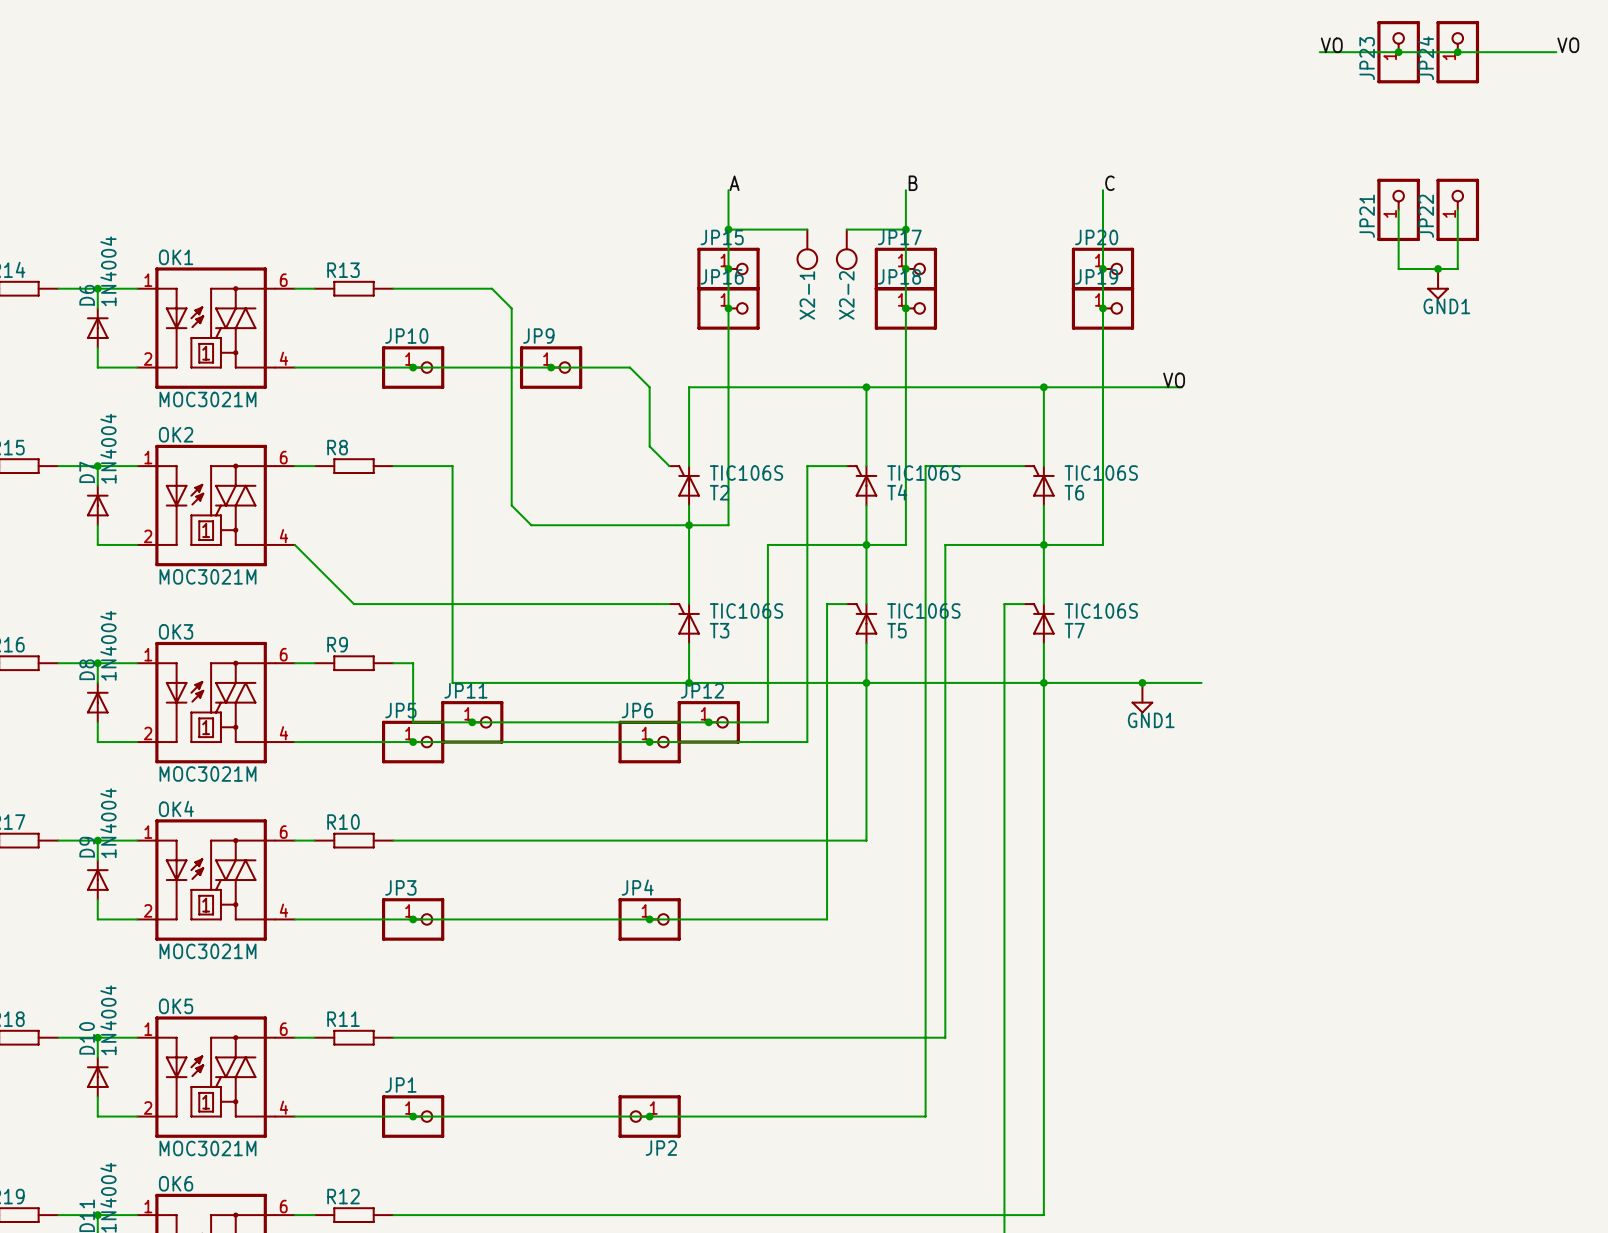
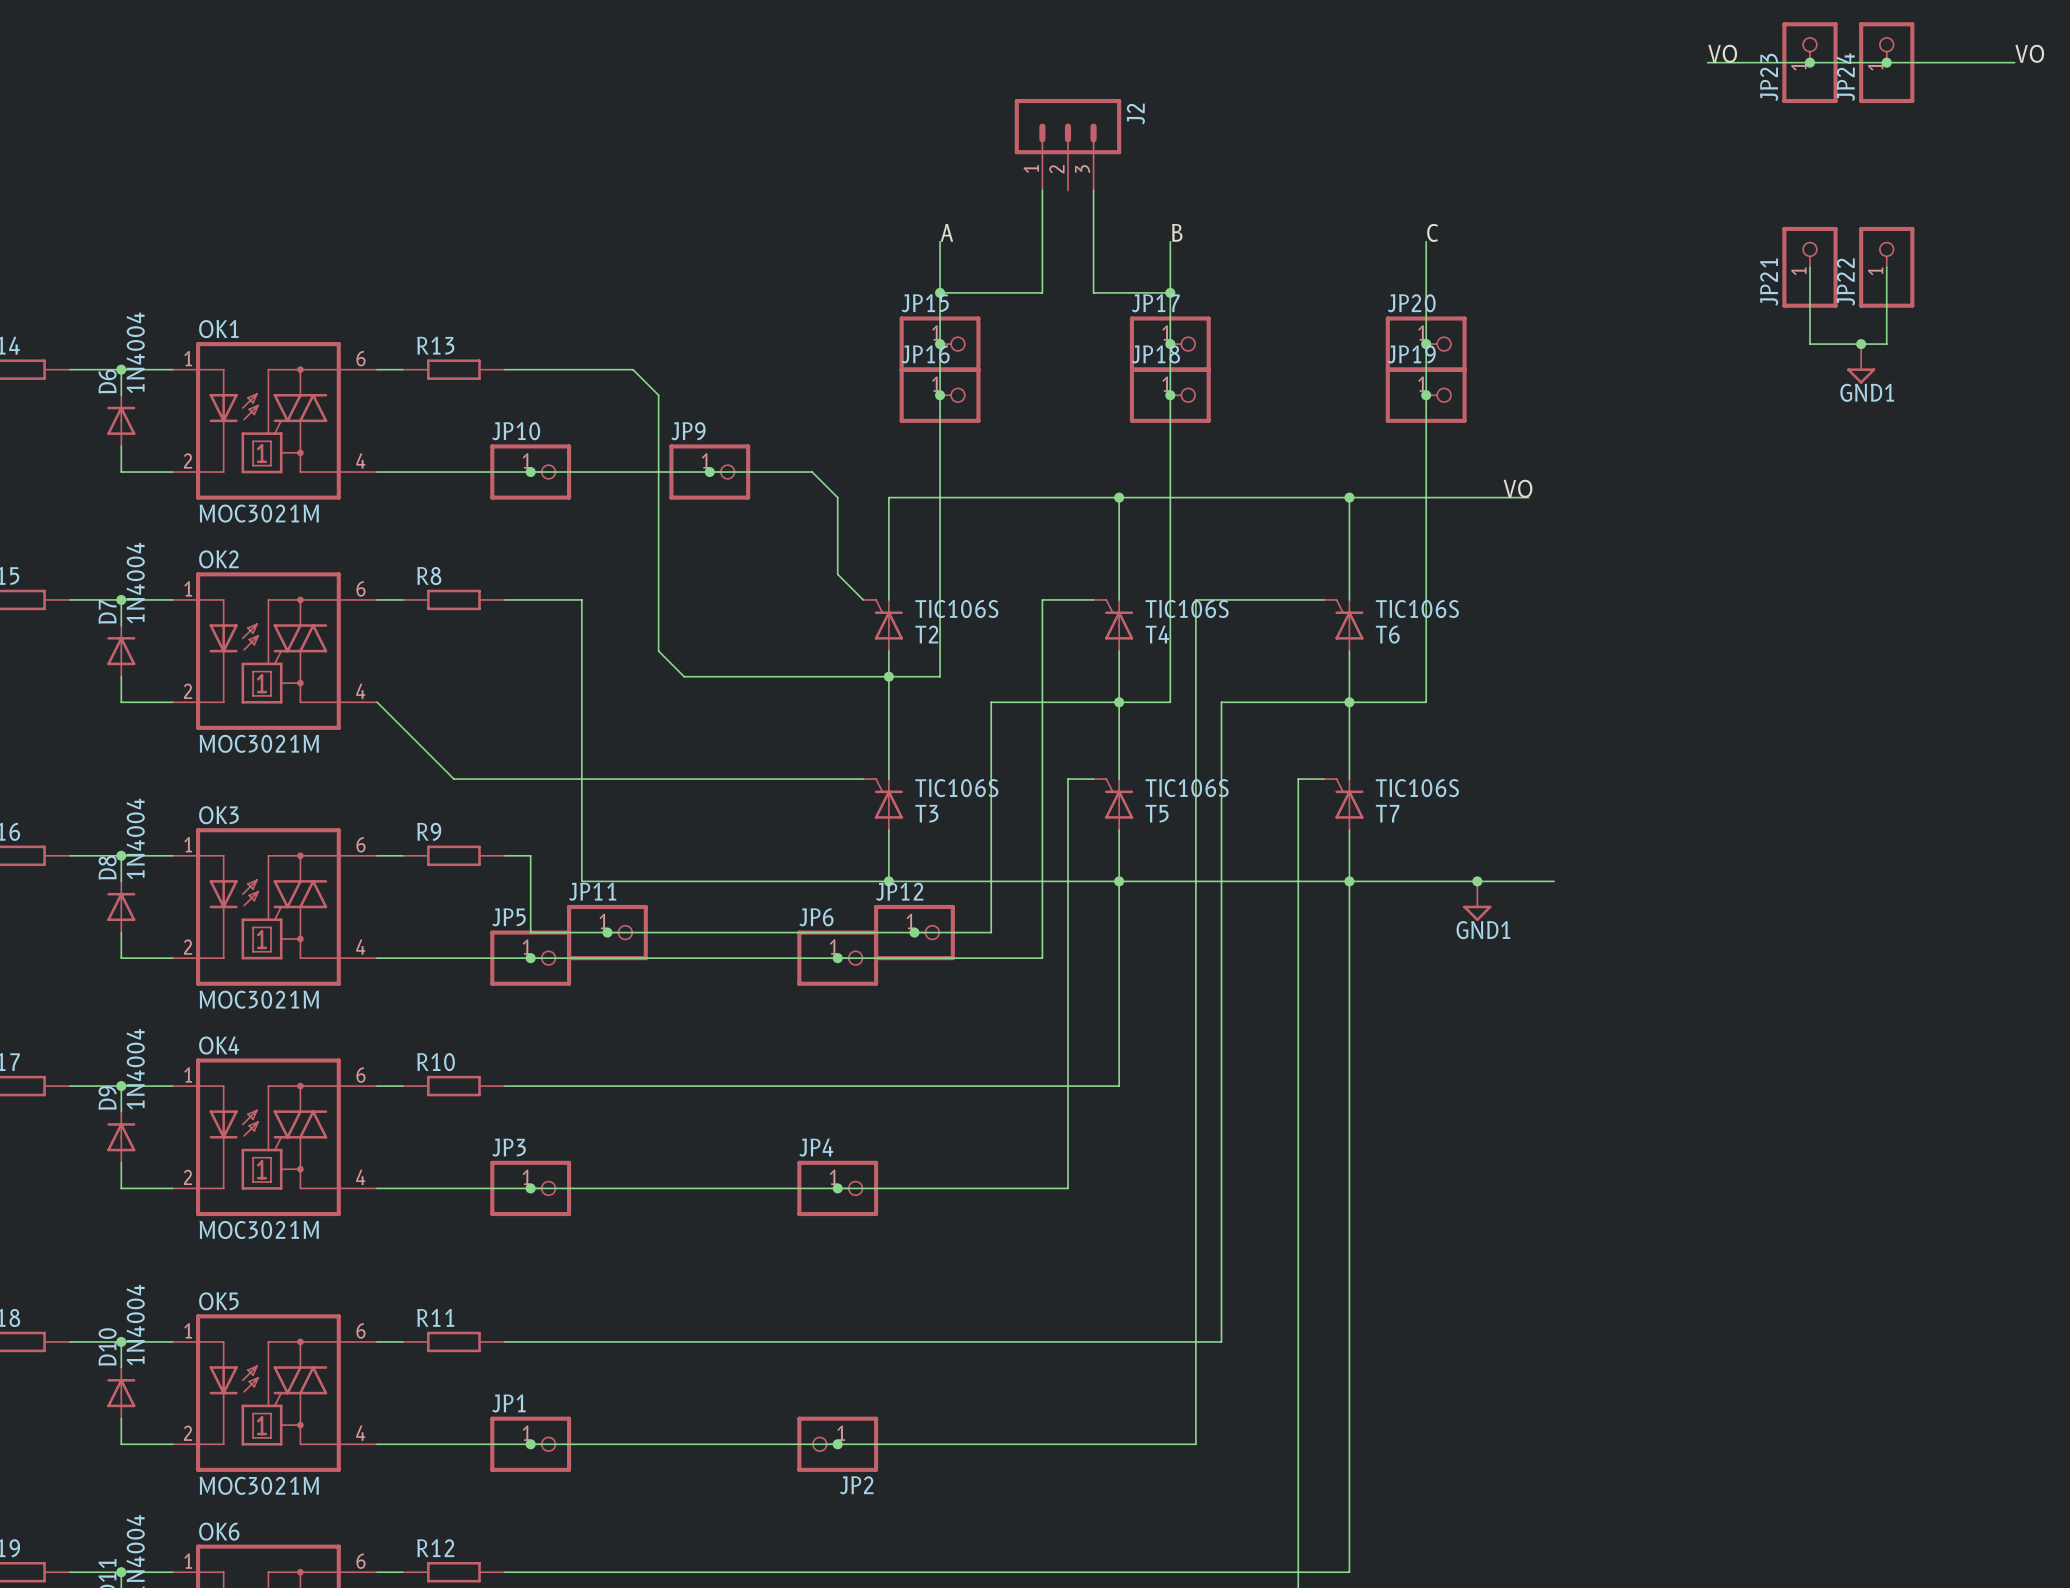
J2: none -> (1067, 144)
wire: none -> (1042, 190) (1042, 292)
wire: none -> (1093, 190) (1093, 292)
X2-1: (807, 249) -> none
X2-2: (846, 249) -> none

